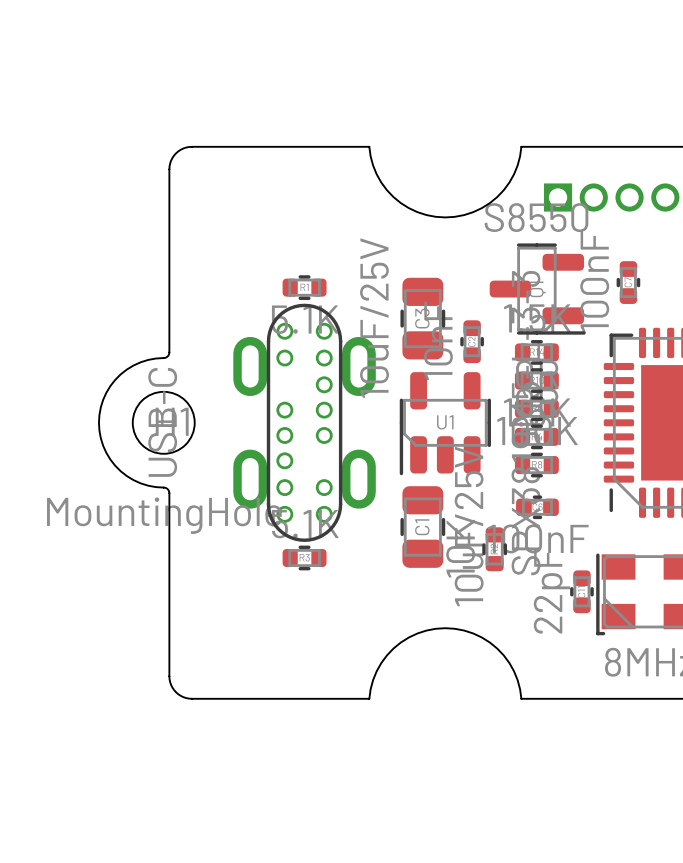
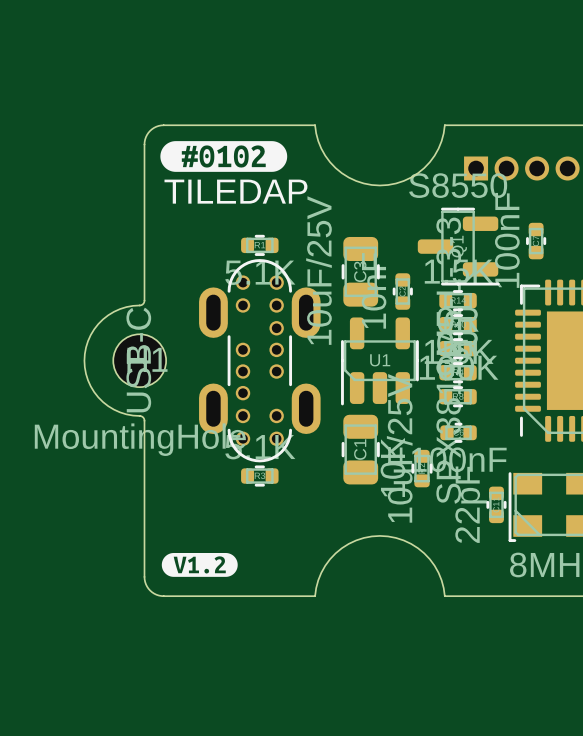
drawing: none -> [160, 141, 288, 172]
text: none -> TILEDAP (235, 191)
part footprint: [233, 303, 376, 542] -> [199, 259, 321, 463]
drawing: none -> [161, 553, 238, 577]

